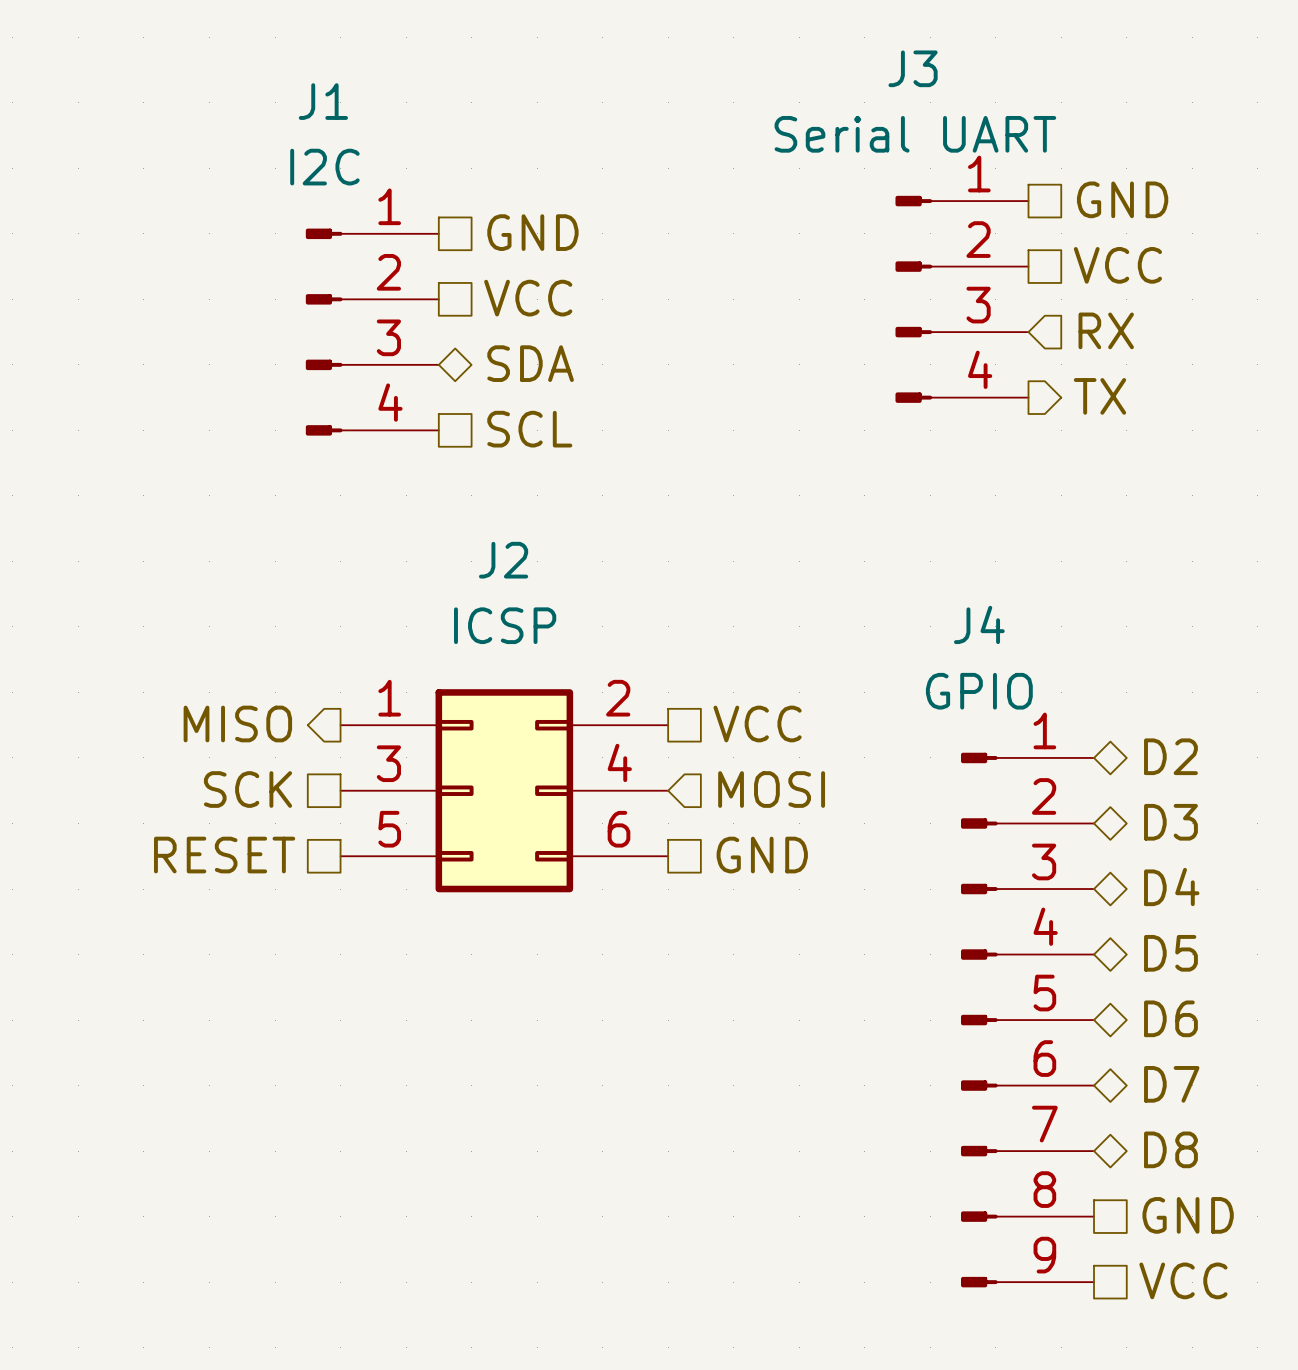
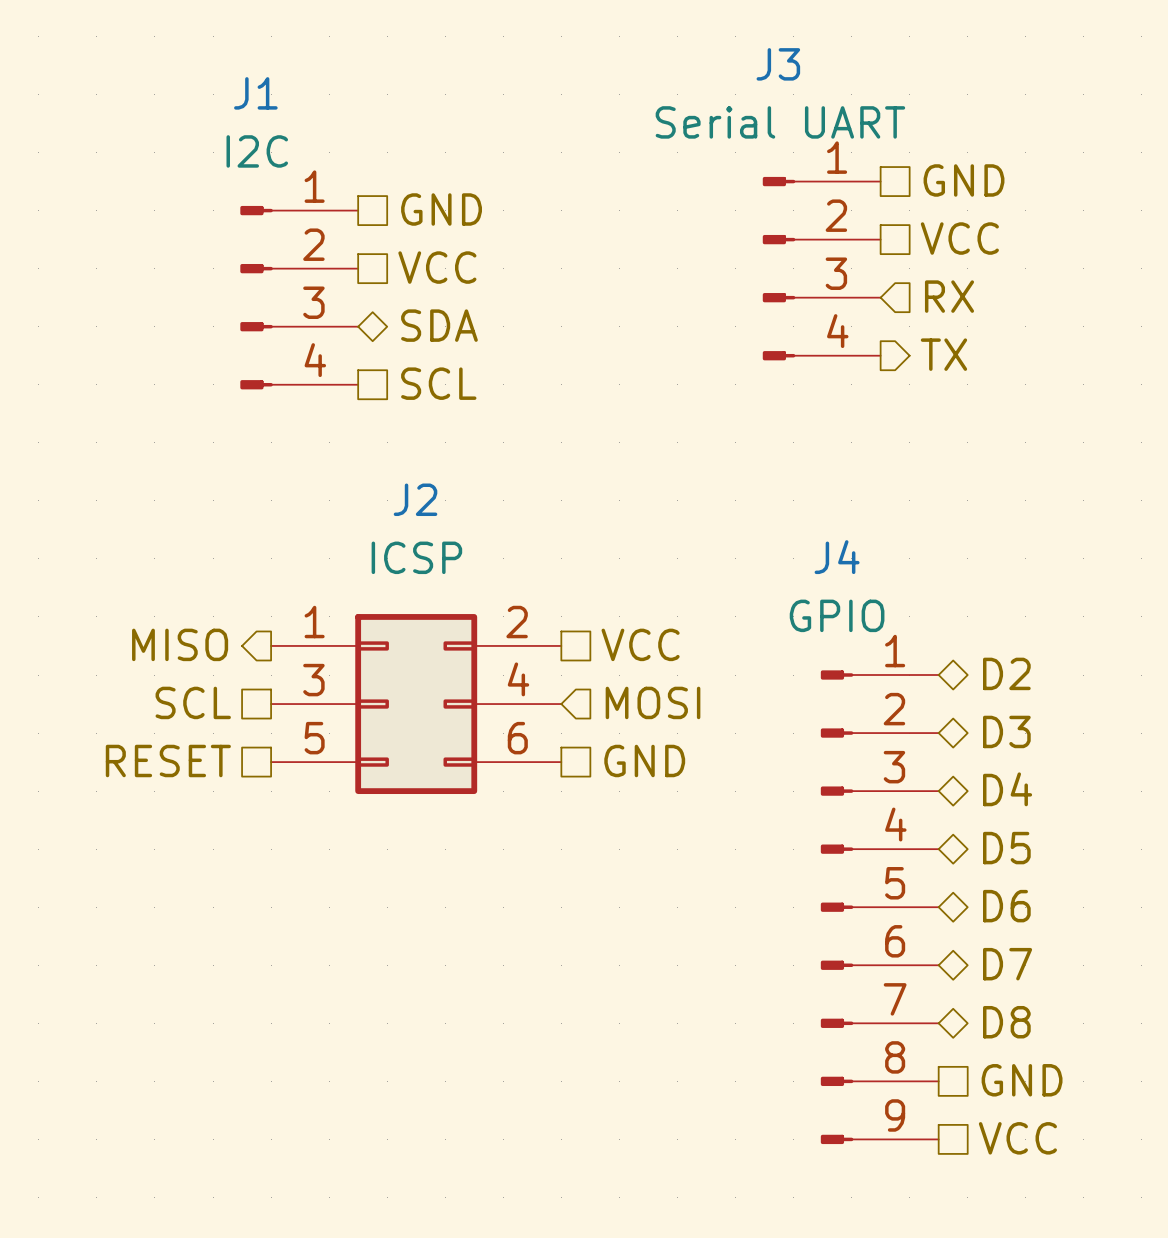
hierarchical label: SCK (247, 789) -> SCL (193, 702)

